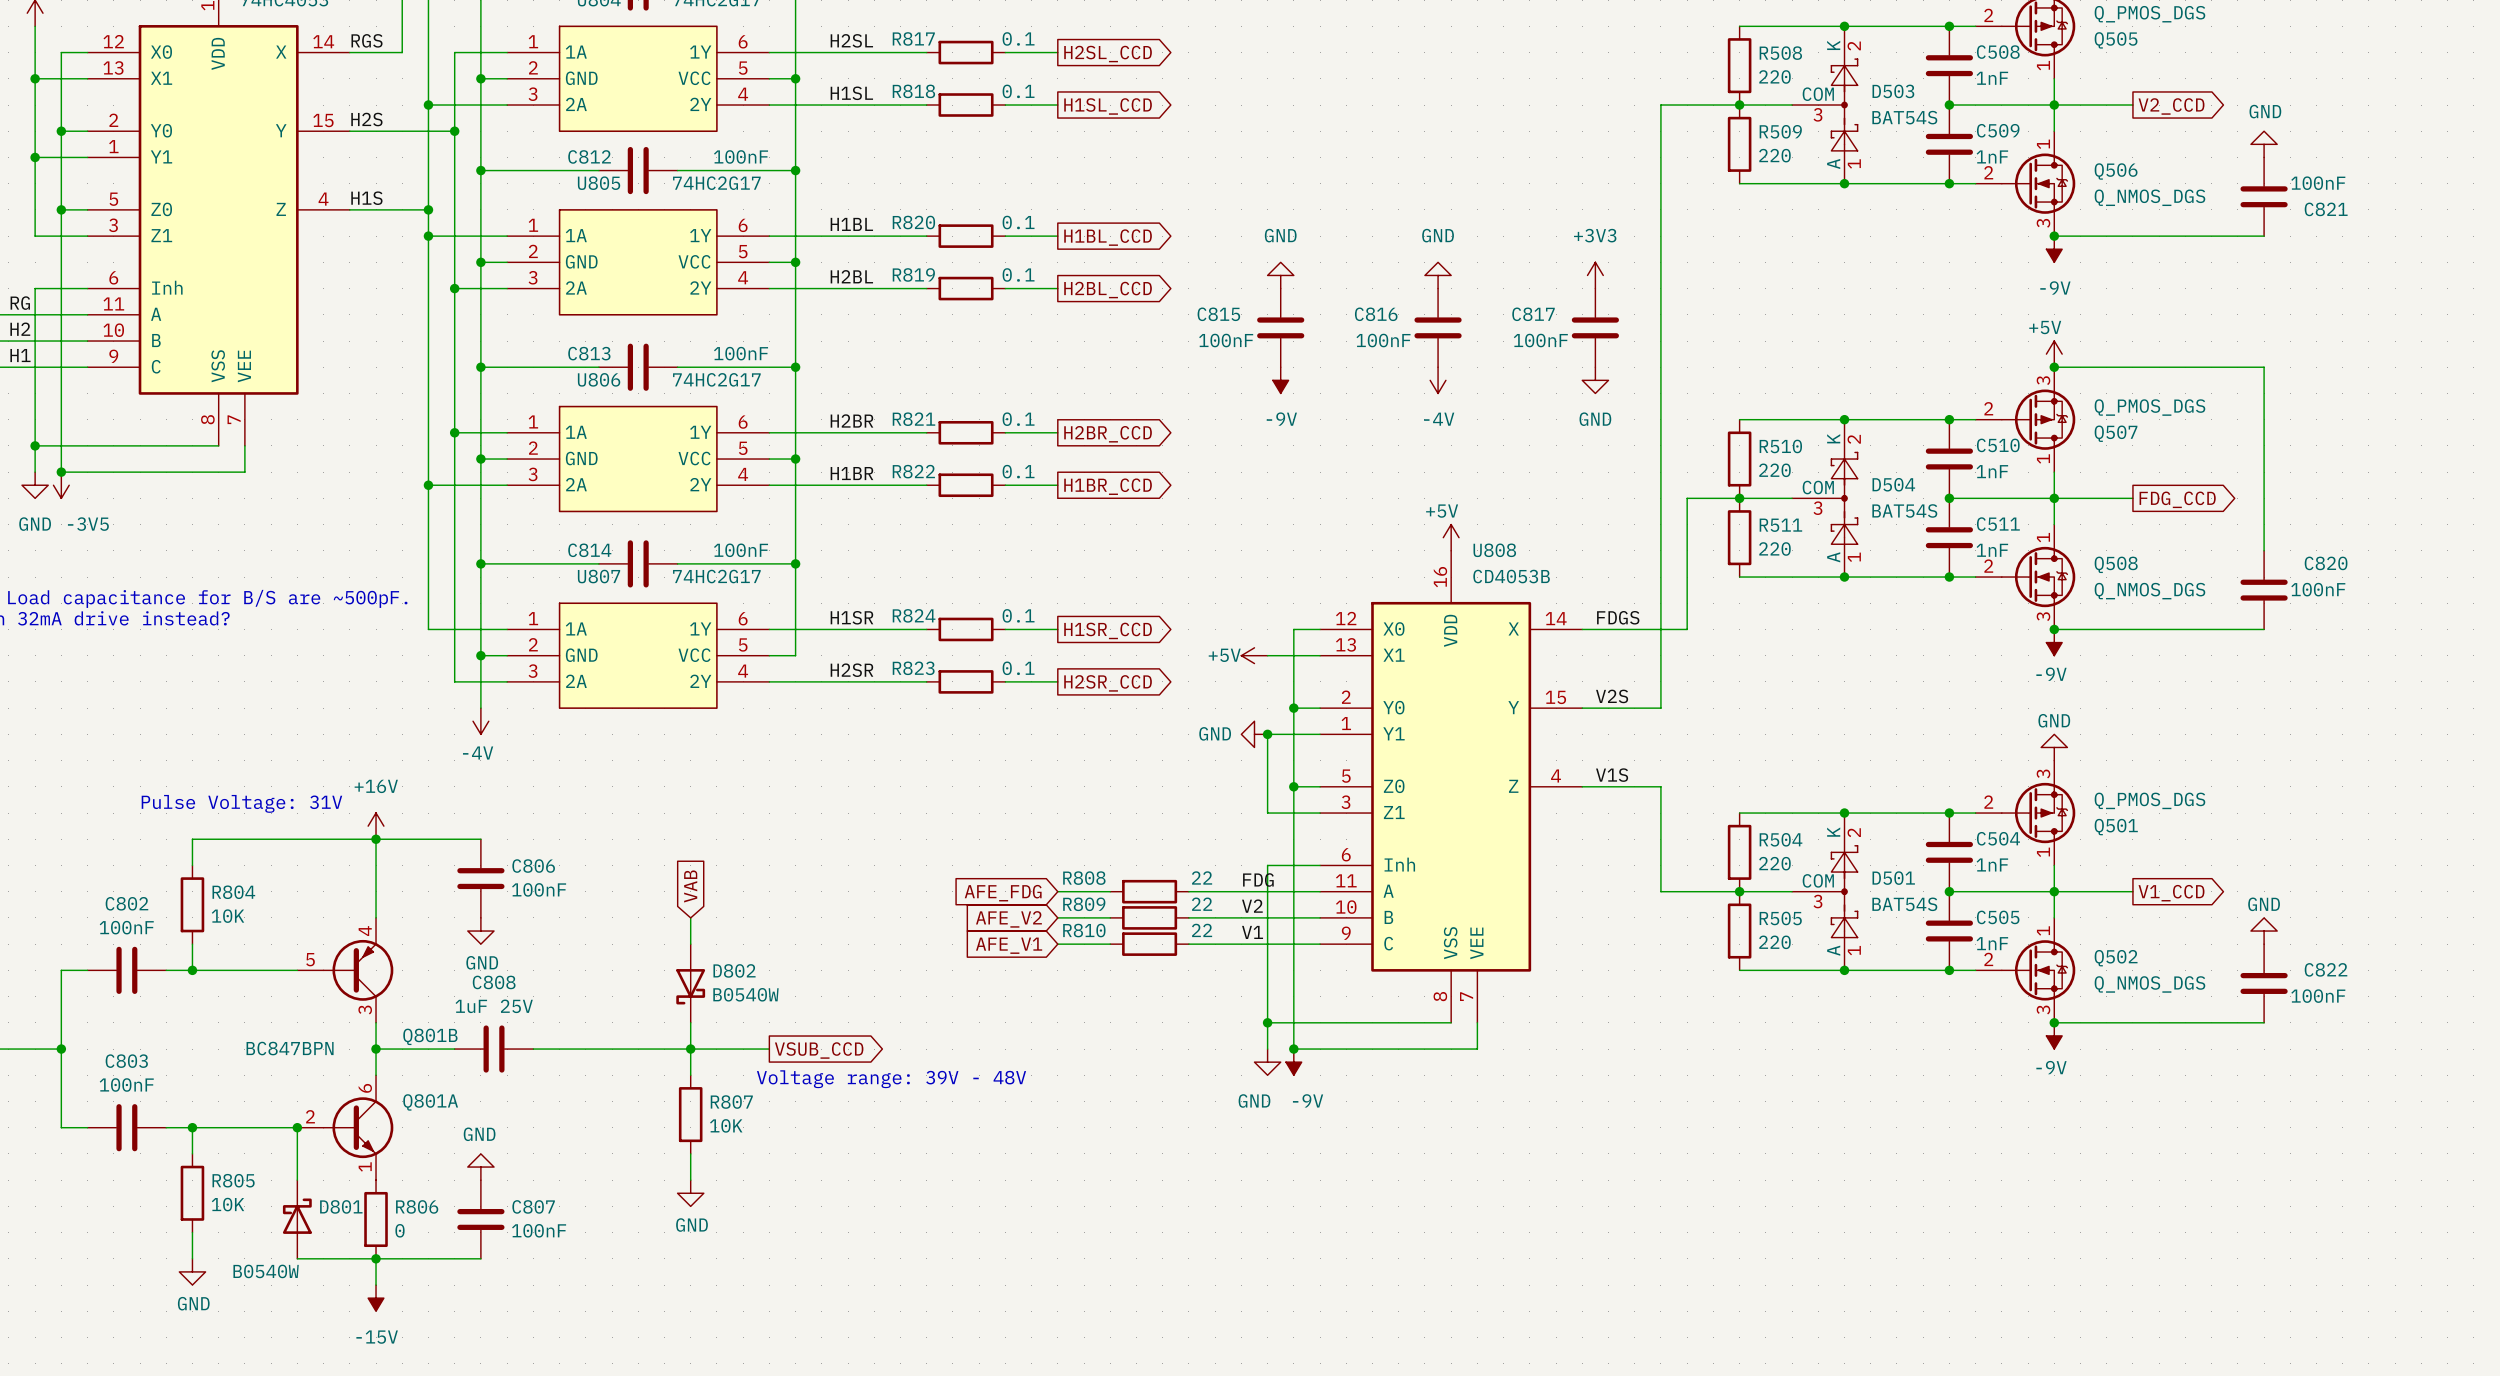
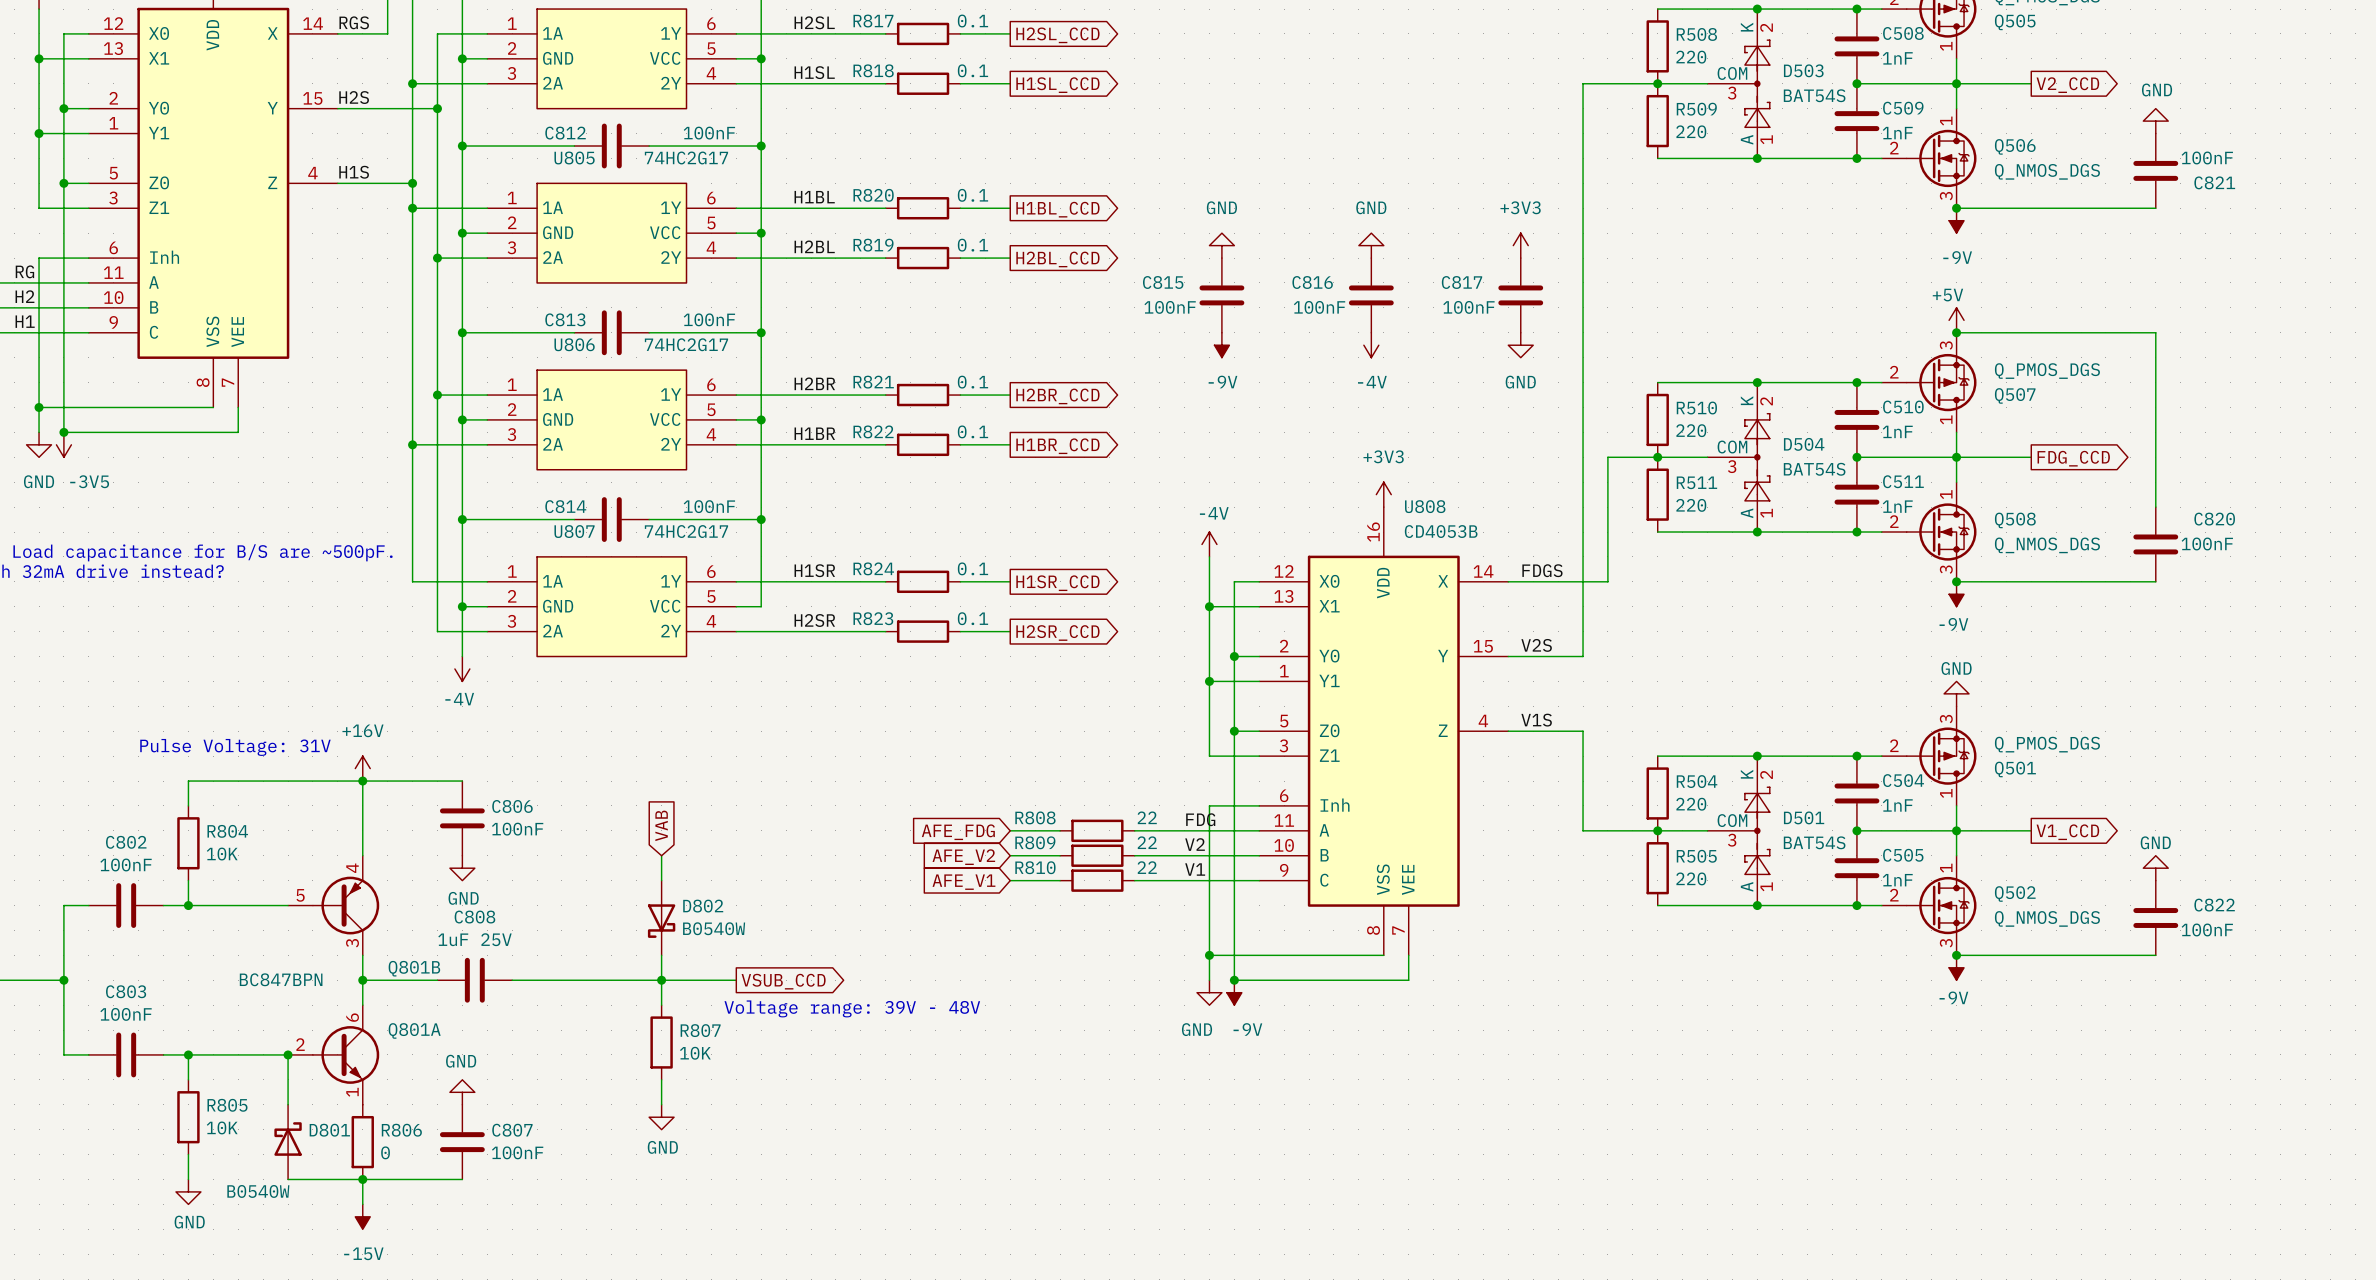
power symbol: +5V (1451, 537) -> +3V3 (1383, 494)
power symbol: none -> -4V (1209, 544)
wire: none -> (1209, 556) (1209, 681)
power symbol: +5V (1254, 655) -> none
junction: none -> (1209, 606)
power symbol: GND (1254, 734) -> none

